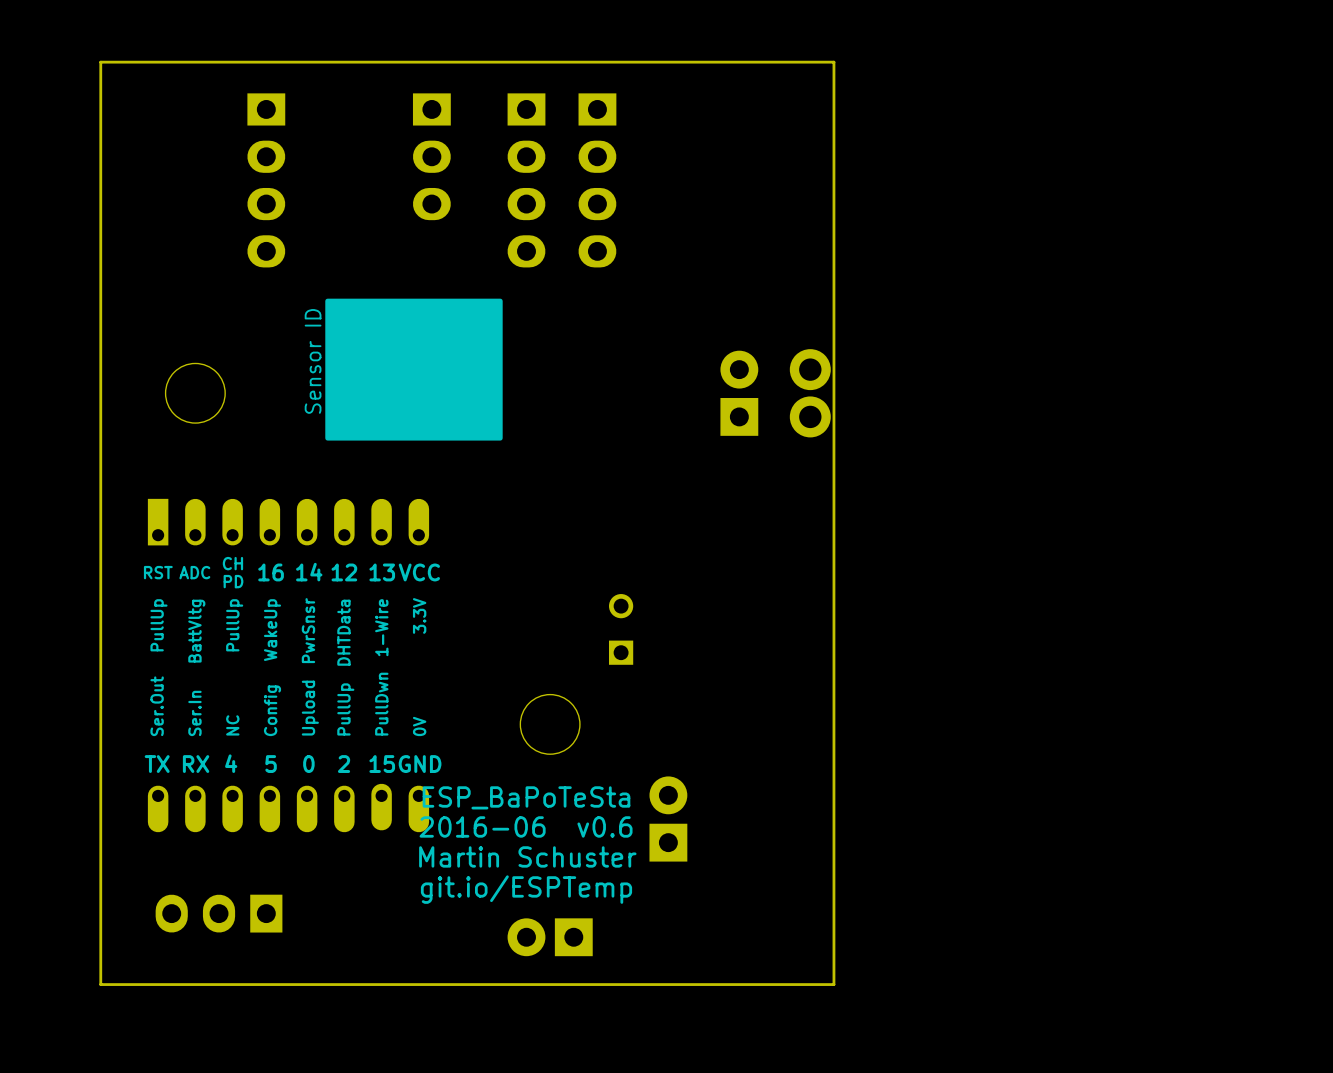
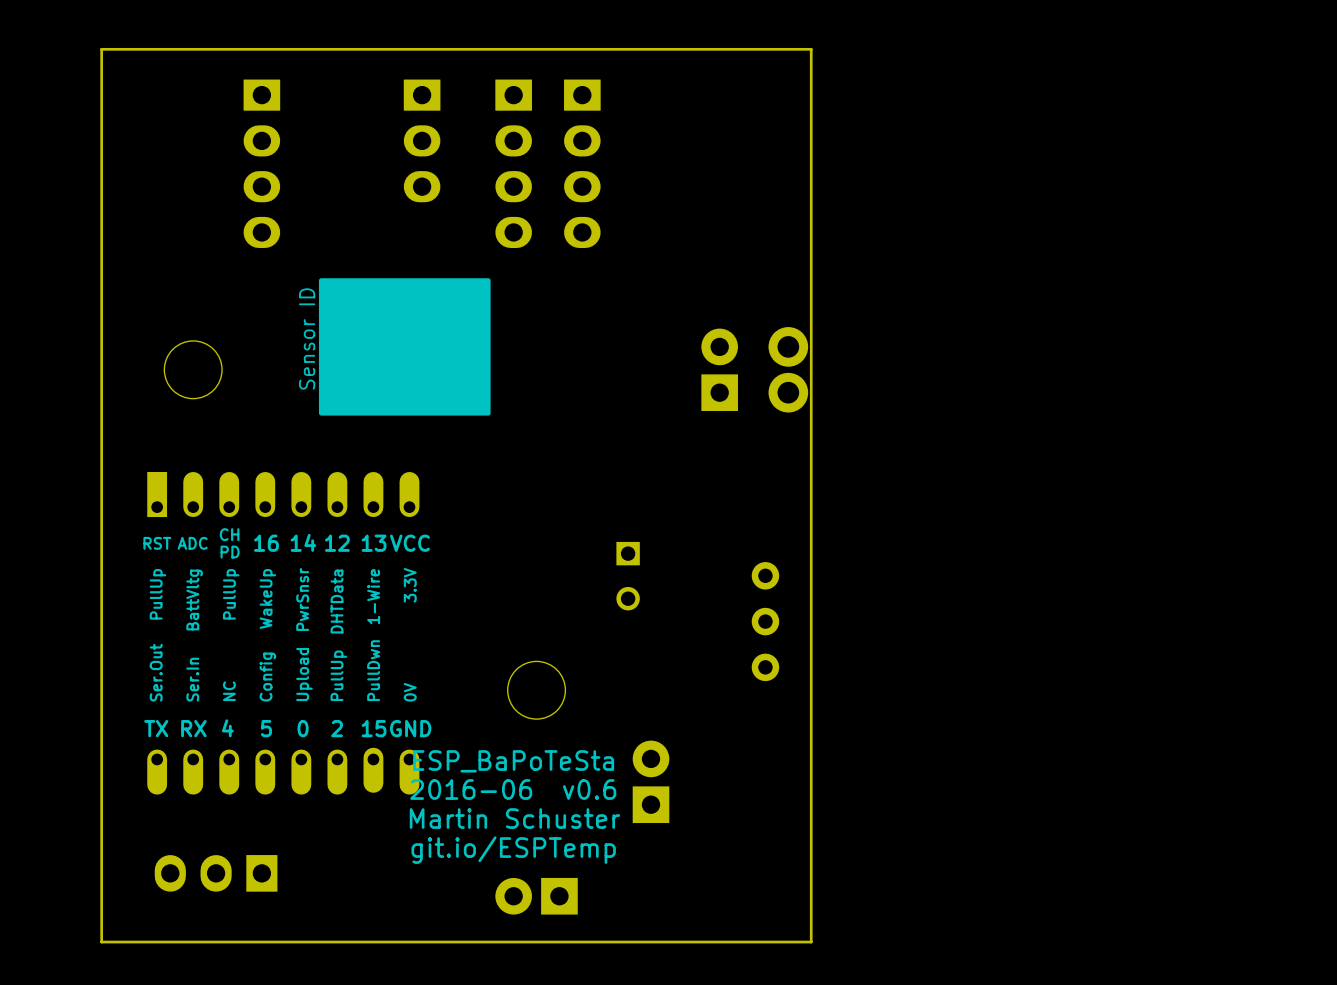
part rotation: 0° (621, 629) -> 180° (628, 576)
part: none -> (765, 621)

